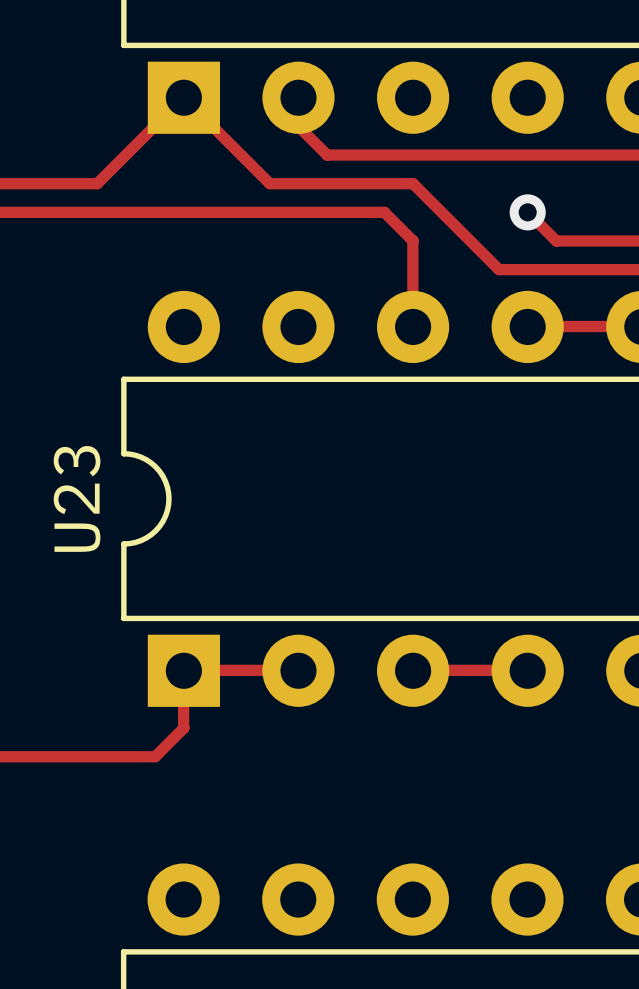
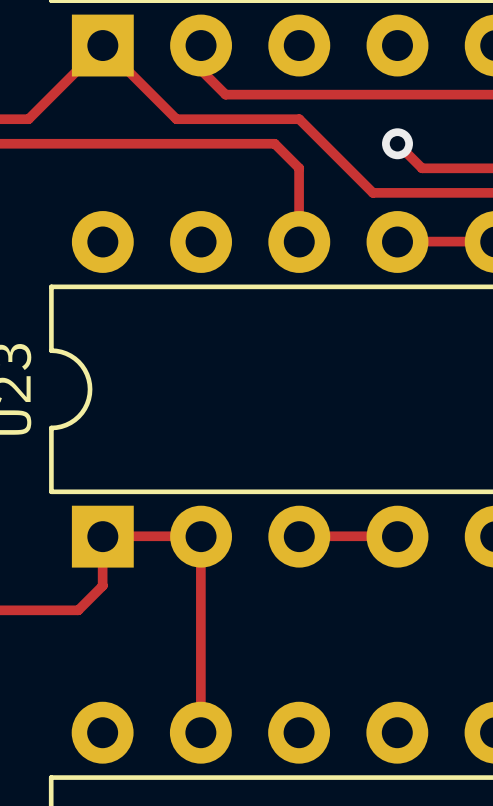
track: none -> (200, 536) (200, 732)

